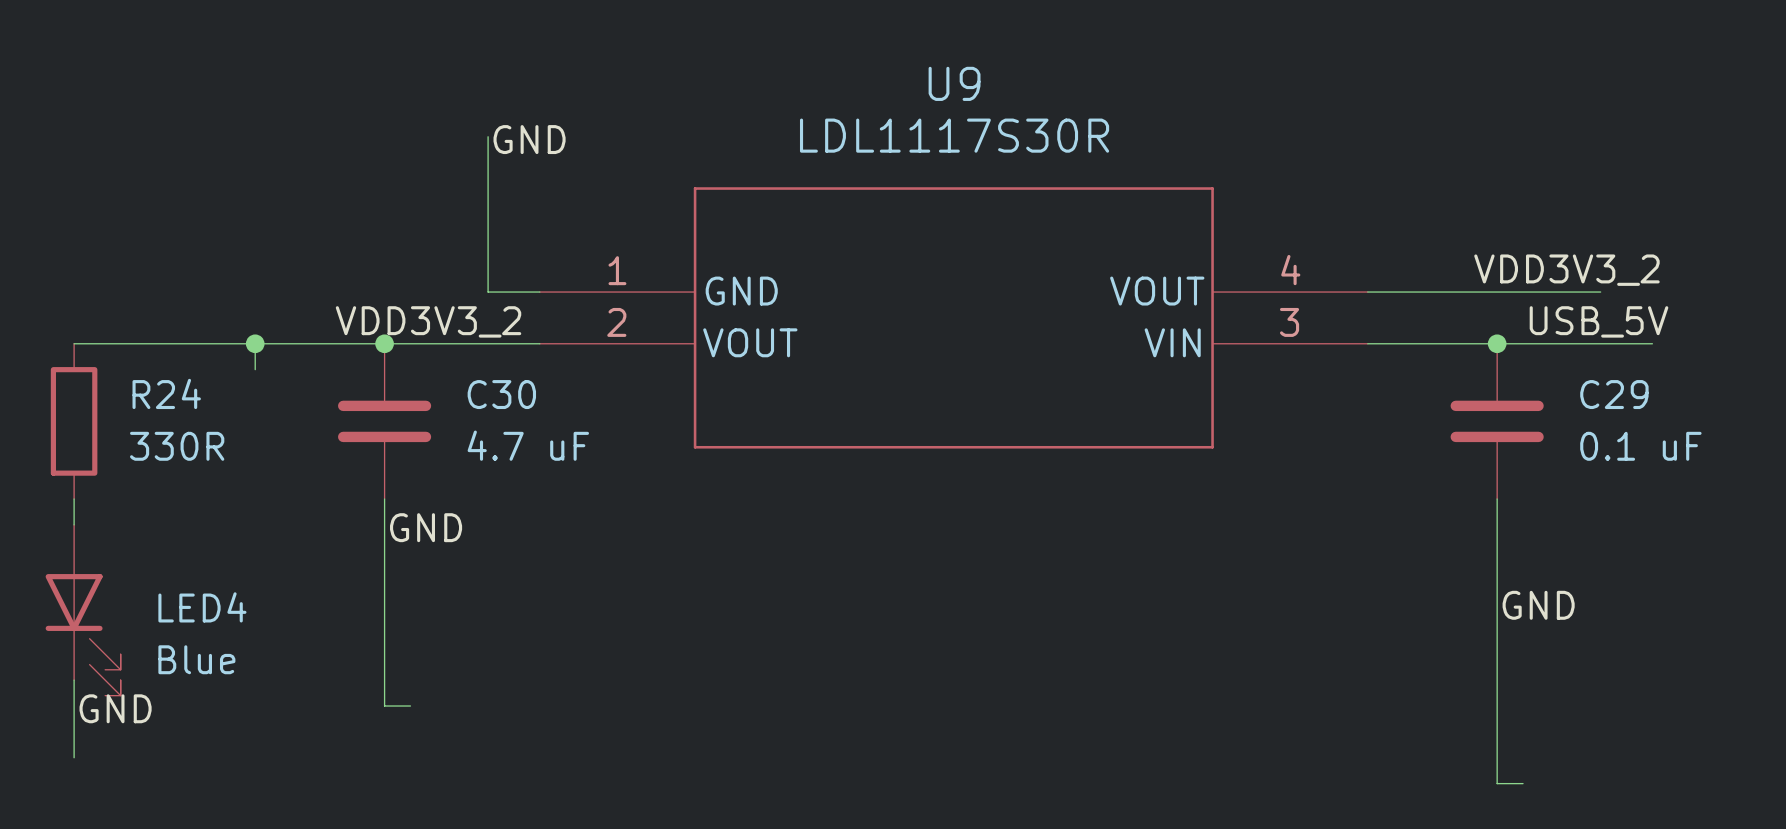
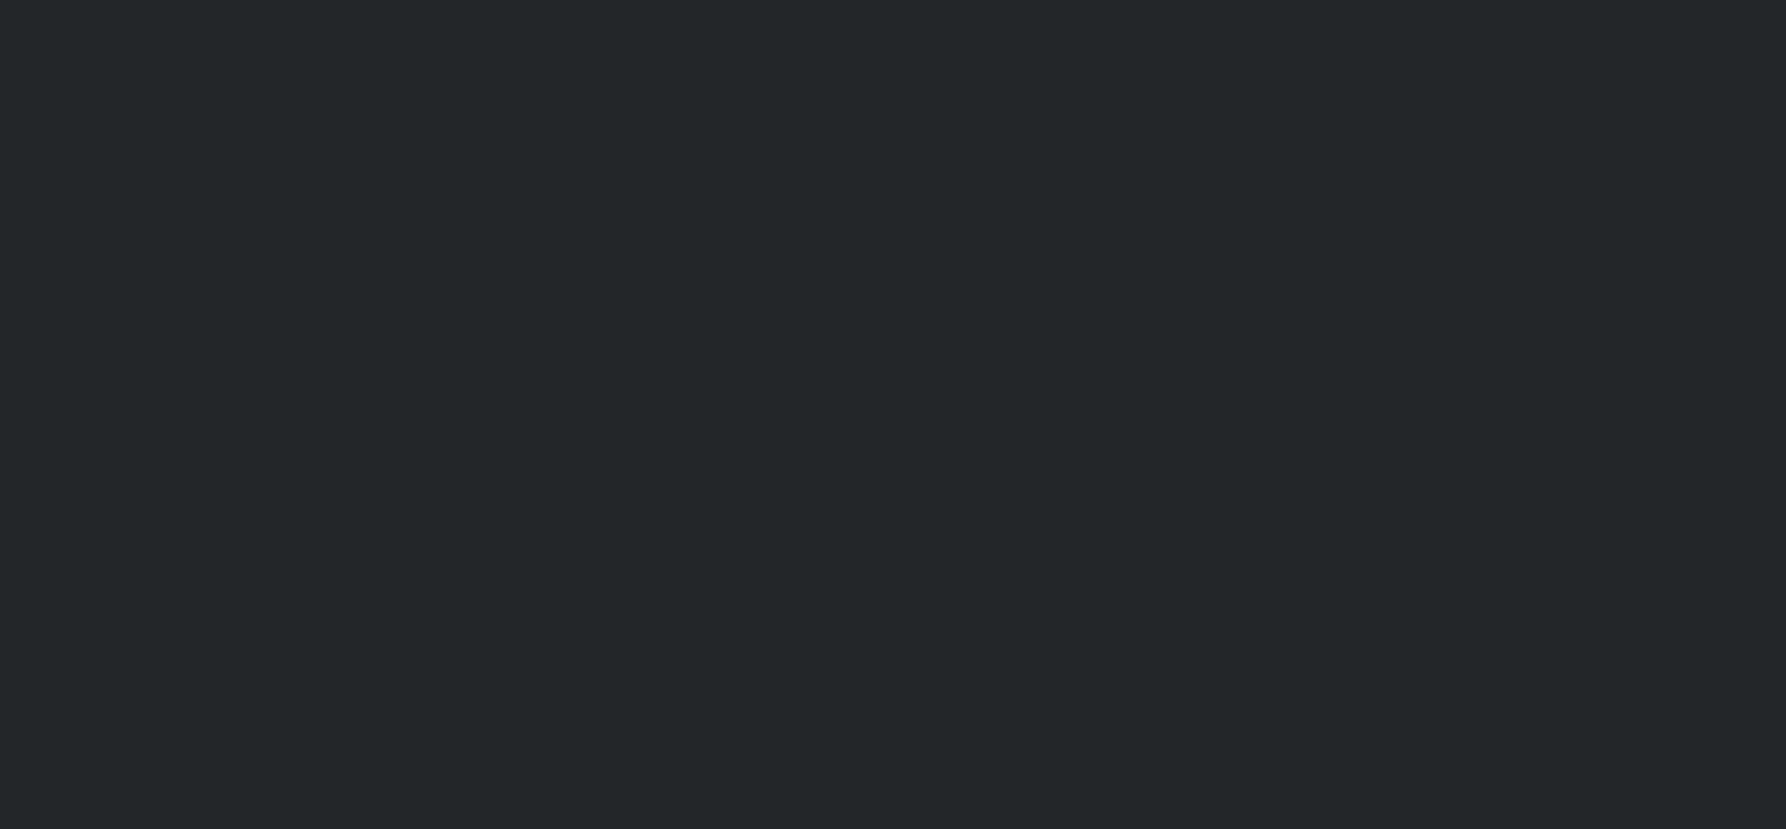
wire: (488, 136) (488, 292) (539, 292) -> none
label: GND (529, 139) -> none
label: VDD3V3_2 (1566, 270) -> none
wire: (1367, 292) (1600, 292) -> none
U9: LDL1117S30R (953, 317) -> none
label: VDD3V3_2 (428, 321) -> none
label: USB_5V (1599, 321) -> none
wire: (74, 343) (539, 343) -> none
wire: (255, 343) (255, 369) -> none
junction: (255, 343) -> none
junction: (384, 343) -> none
wire: (1367, 343) (1652, 343) -> none
junction: (1497, 343) -> none
R24: 330R (74, 421) -> none
C30: 4.7 uF (384, 421) -> none
C29: 0.1 uF (1497, 421) -> none
wire: (74, 499) (74, 524) -> none
wire: (384, 499) (384, 706) (410, 706) -> none
wire: (1497, 499) (1497, 783) (1523, 783) -> none
label: GND (426, 527) -> none
label: GND (1538, 605) -> none
LED4: Blue (83, 610) -> none
wire: (74, 680) (74, 757) -> none
label: GND (115, 708) -> none

